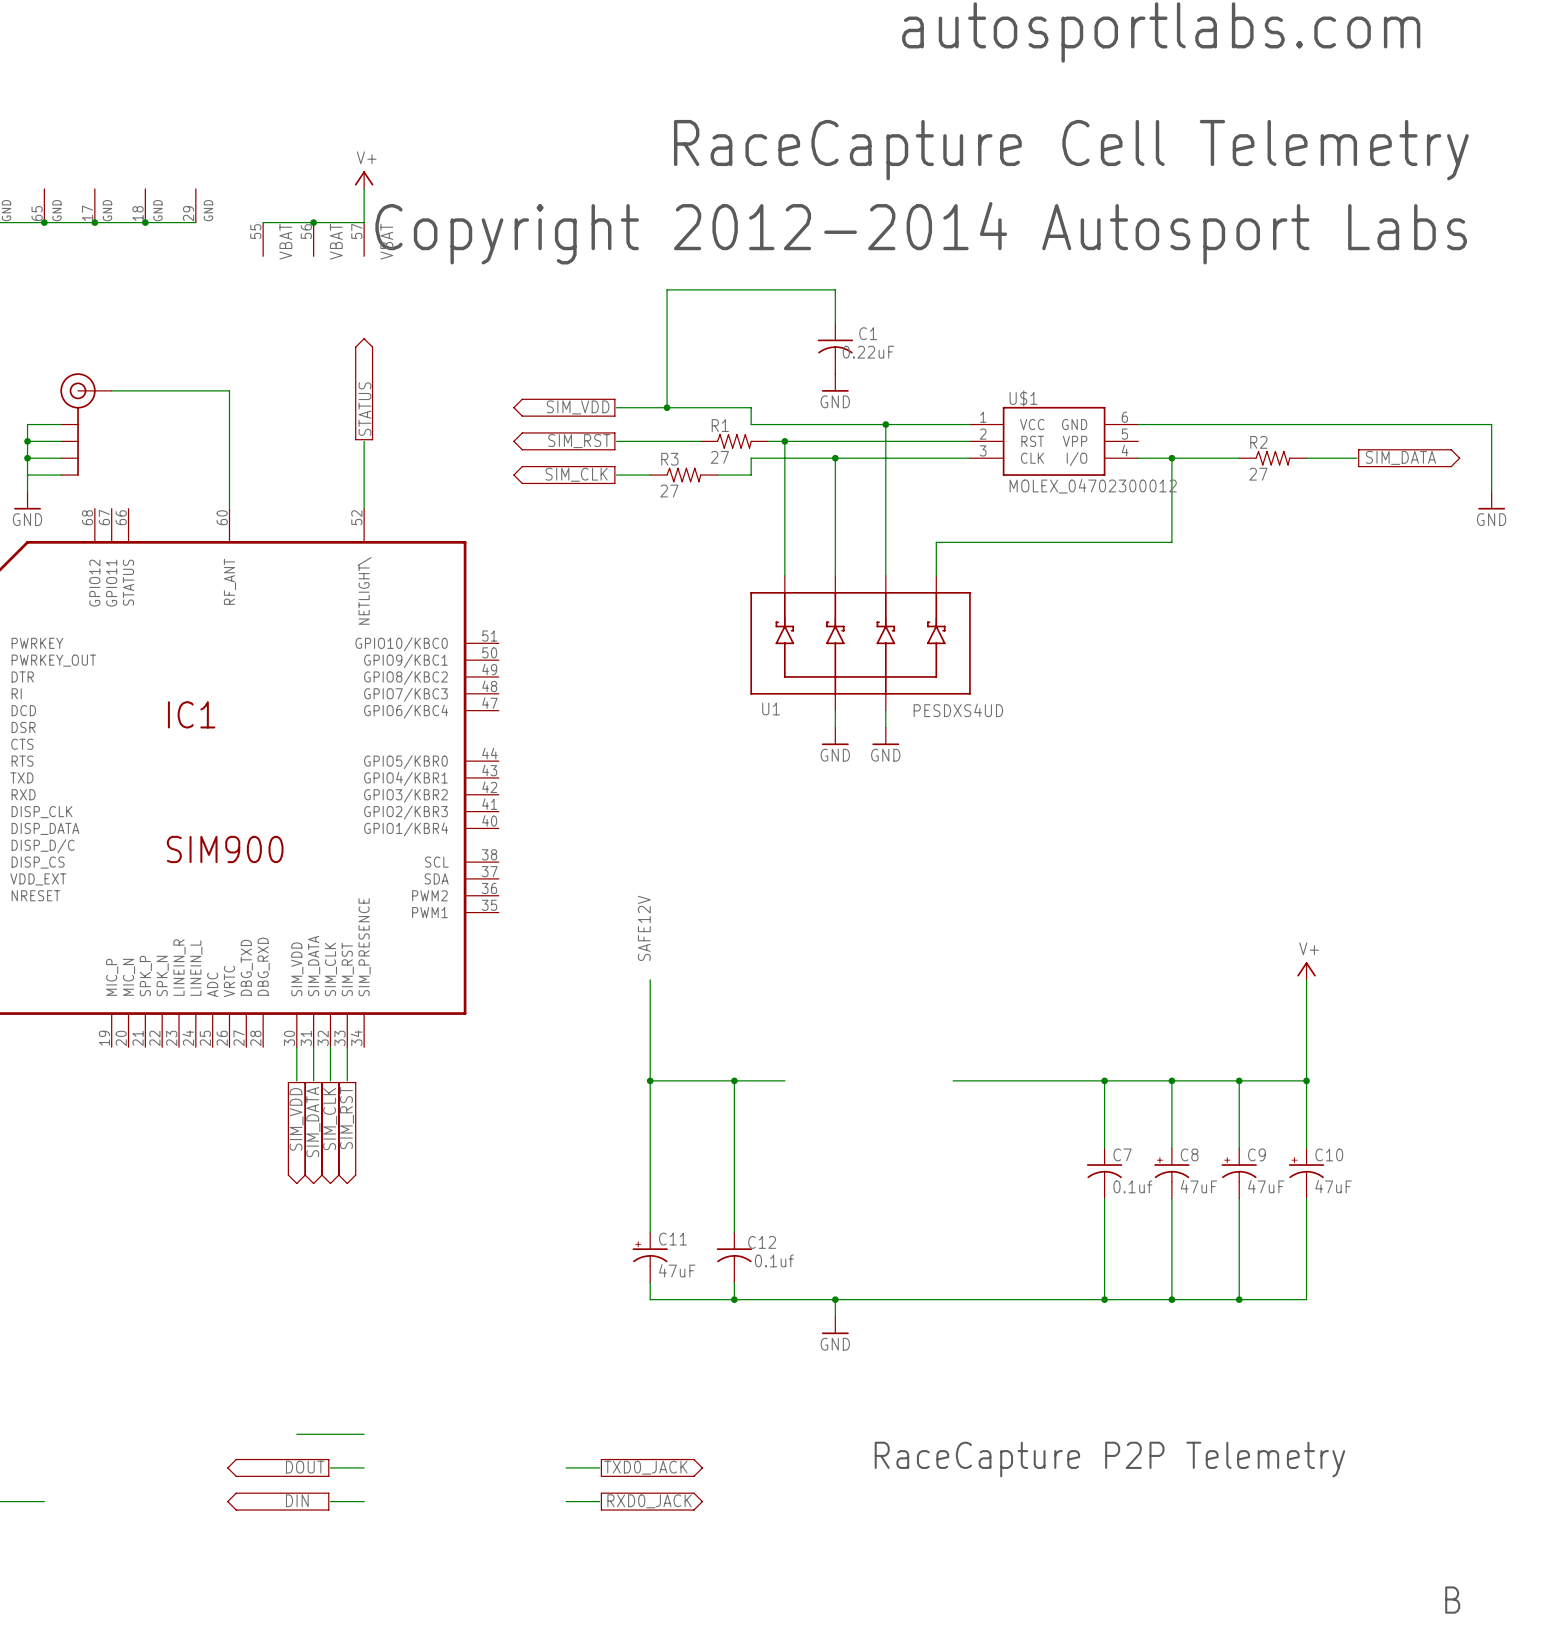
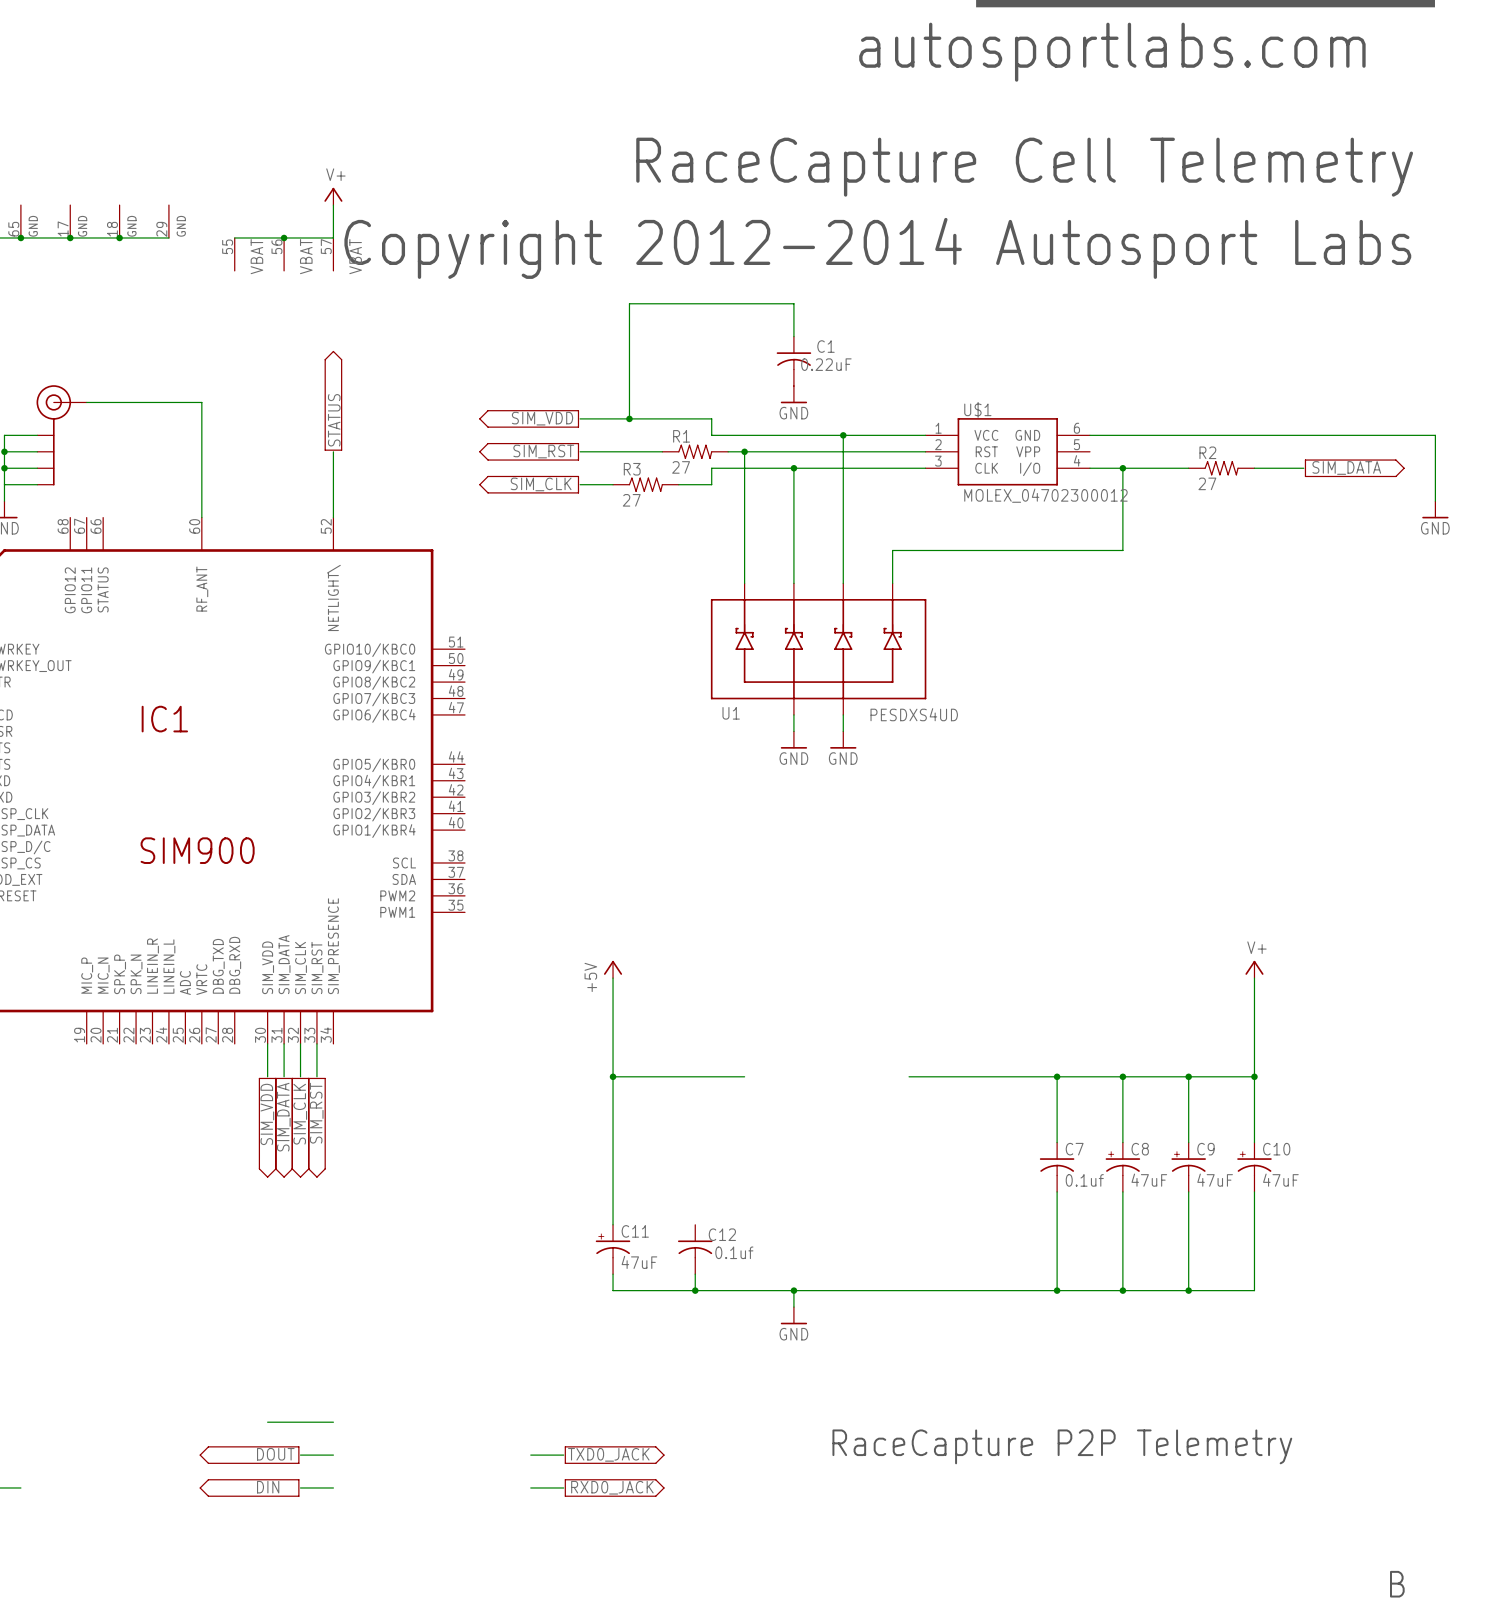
label: SAFE12V (644, 928) -> none
power symbol: none -> +5V (613, 969)
wire: (734, 1080) (734, 1232) -> none
junction: (734, 1080) -> none

